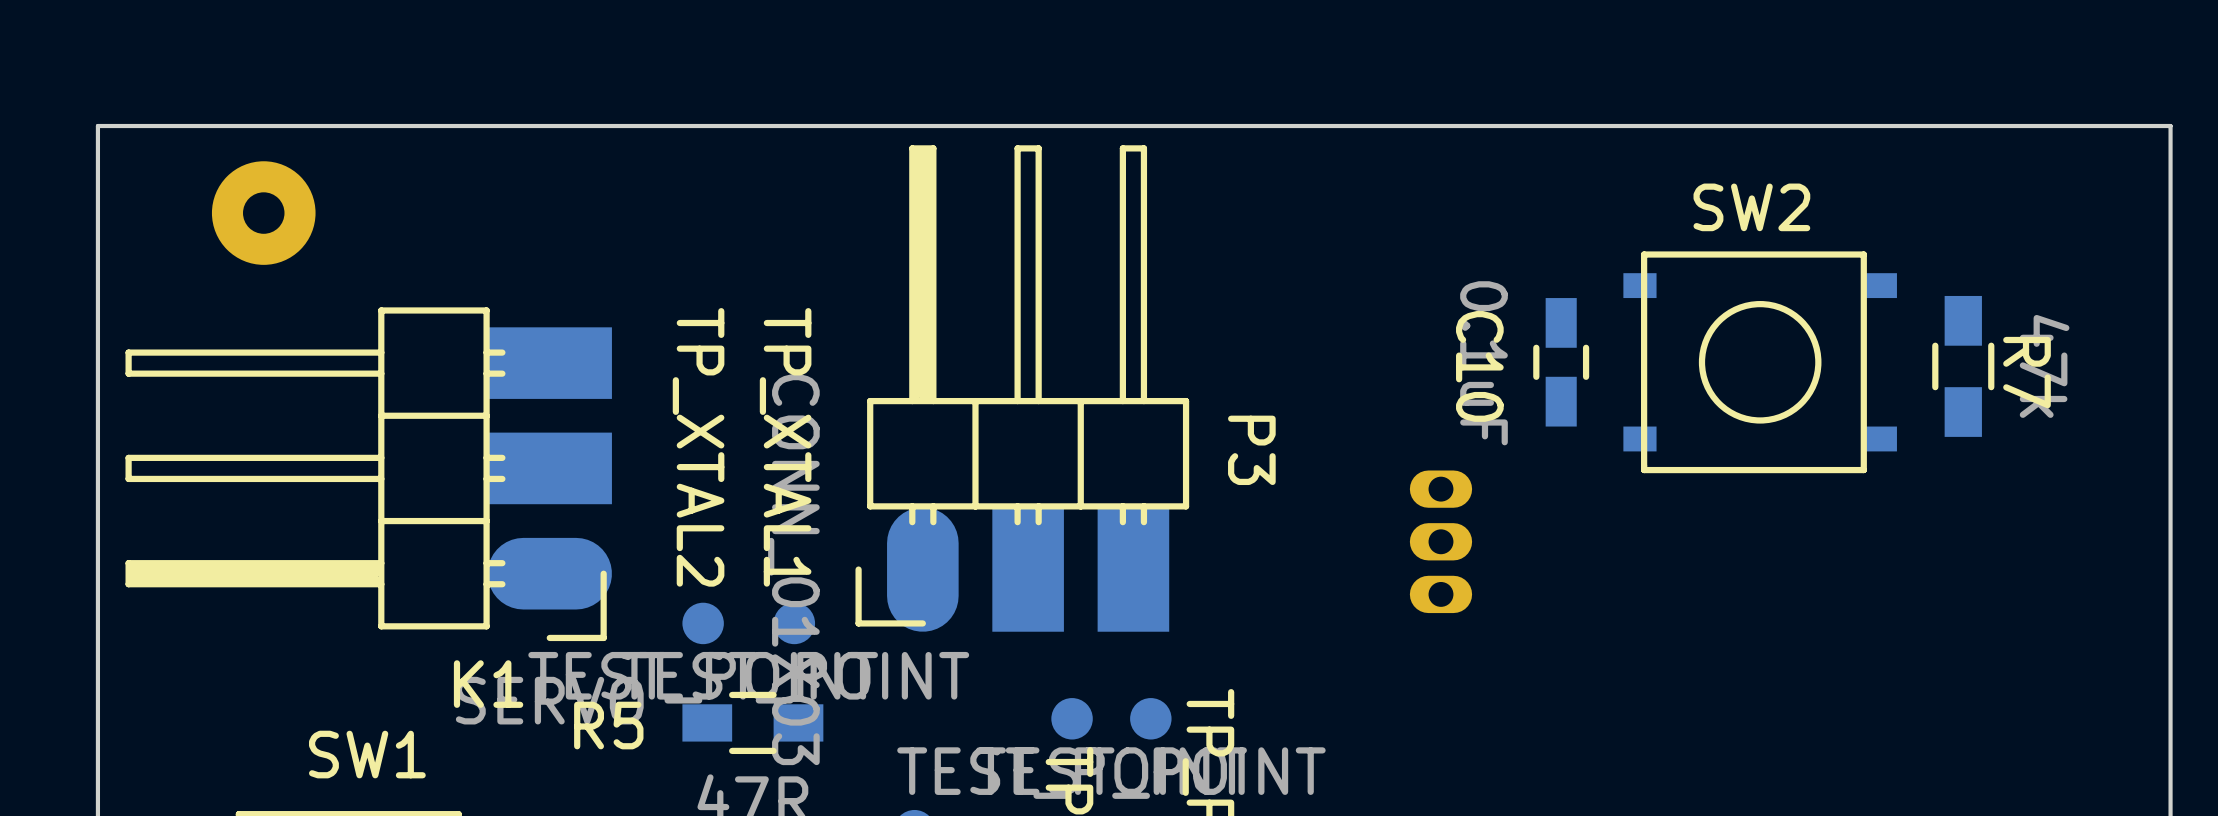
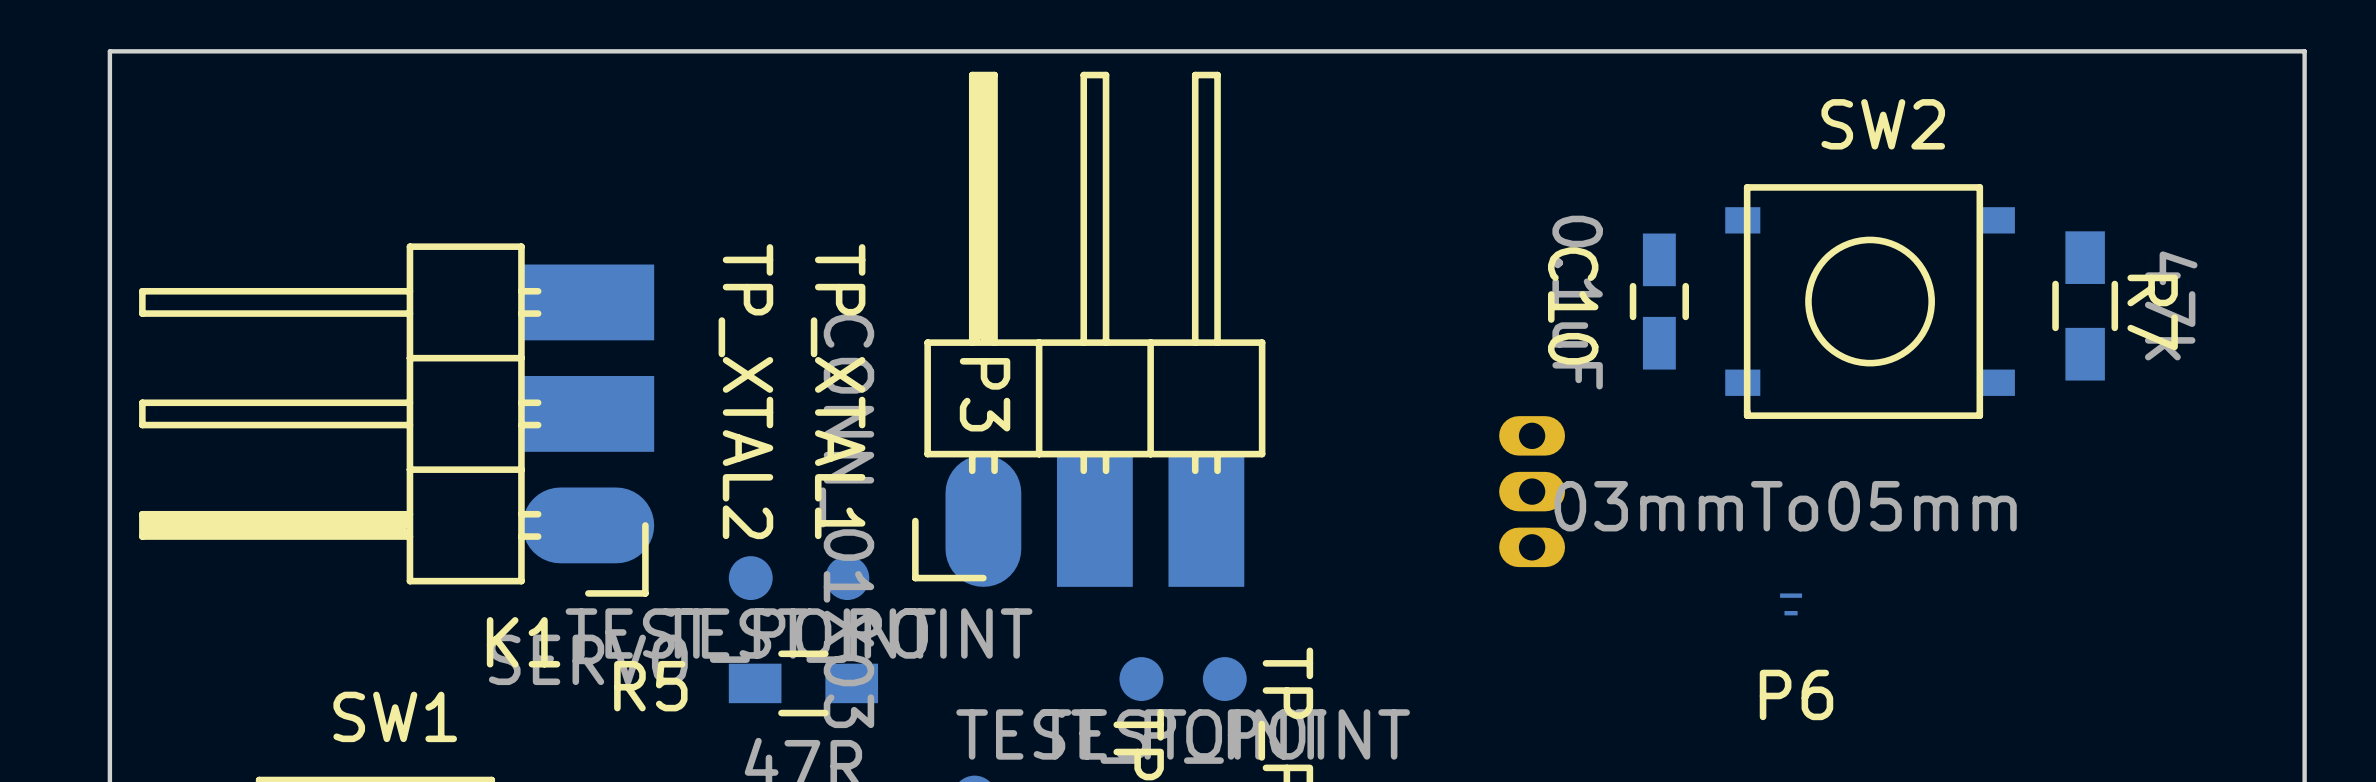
SW2 name position: SW2 (1751, 207) -> SW2 (1883, 124)
part: (263, 213) -> none
P3 name position: P3 (1251, 450) -> P3 (985, 394)
P6: none -> 03mmTo05mm (1791, 604)

